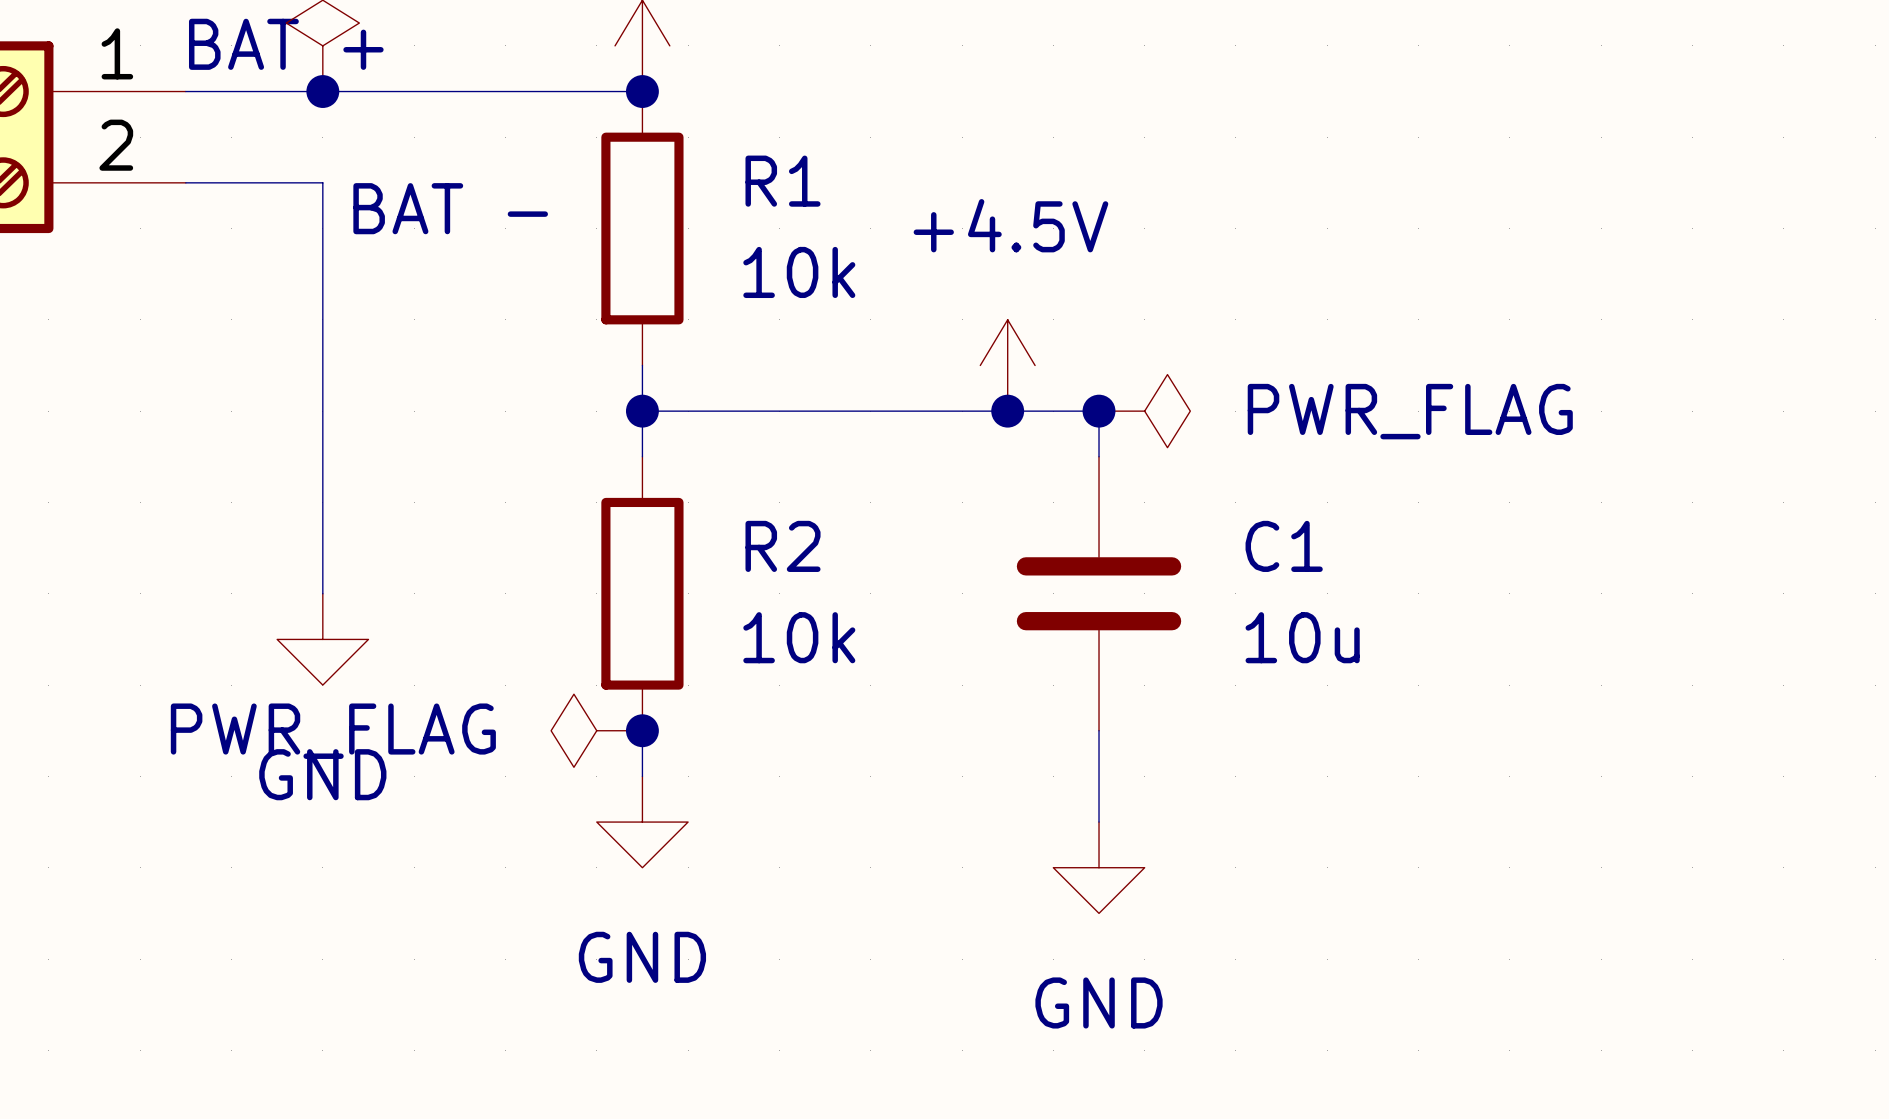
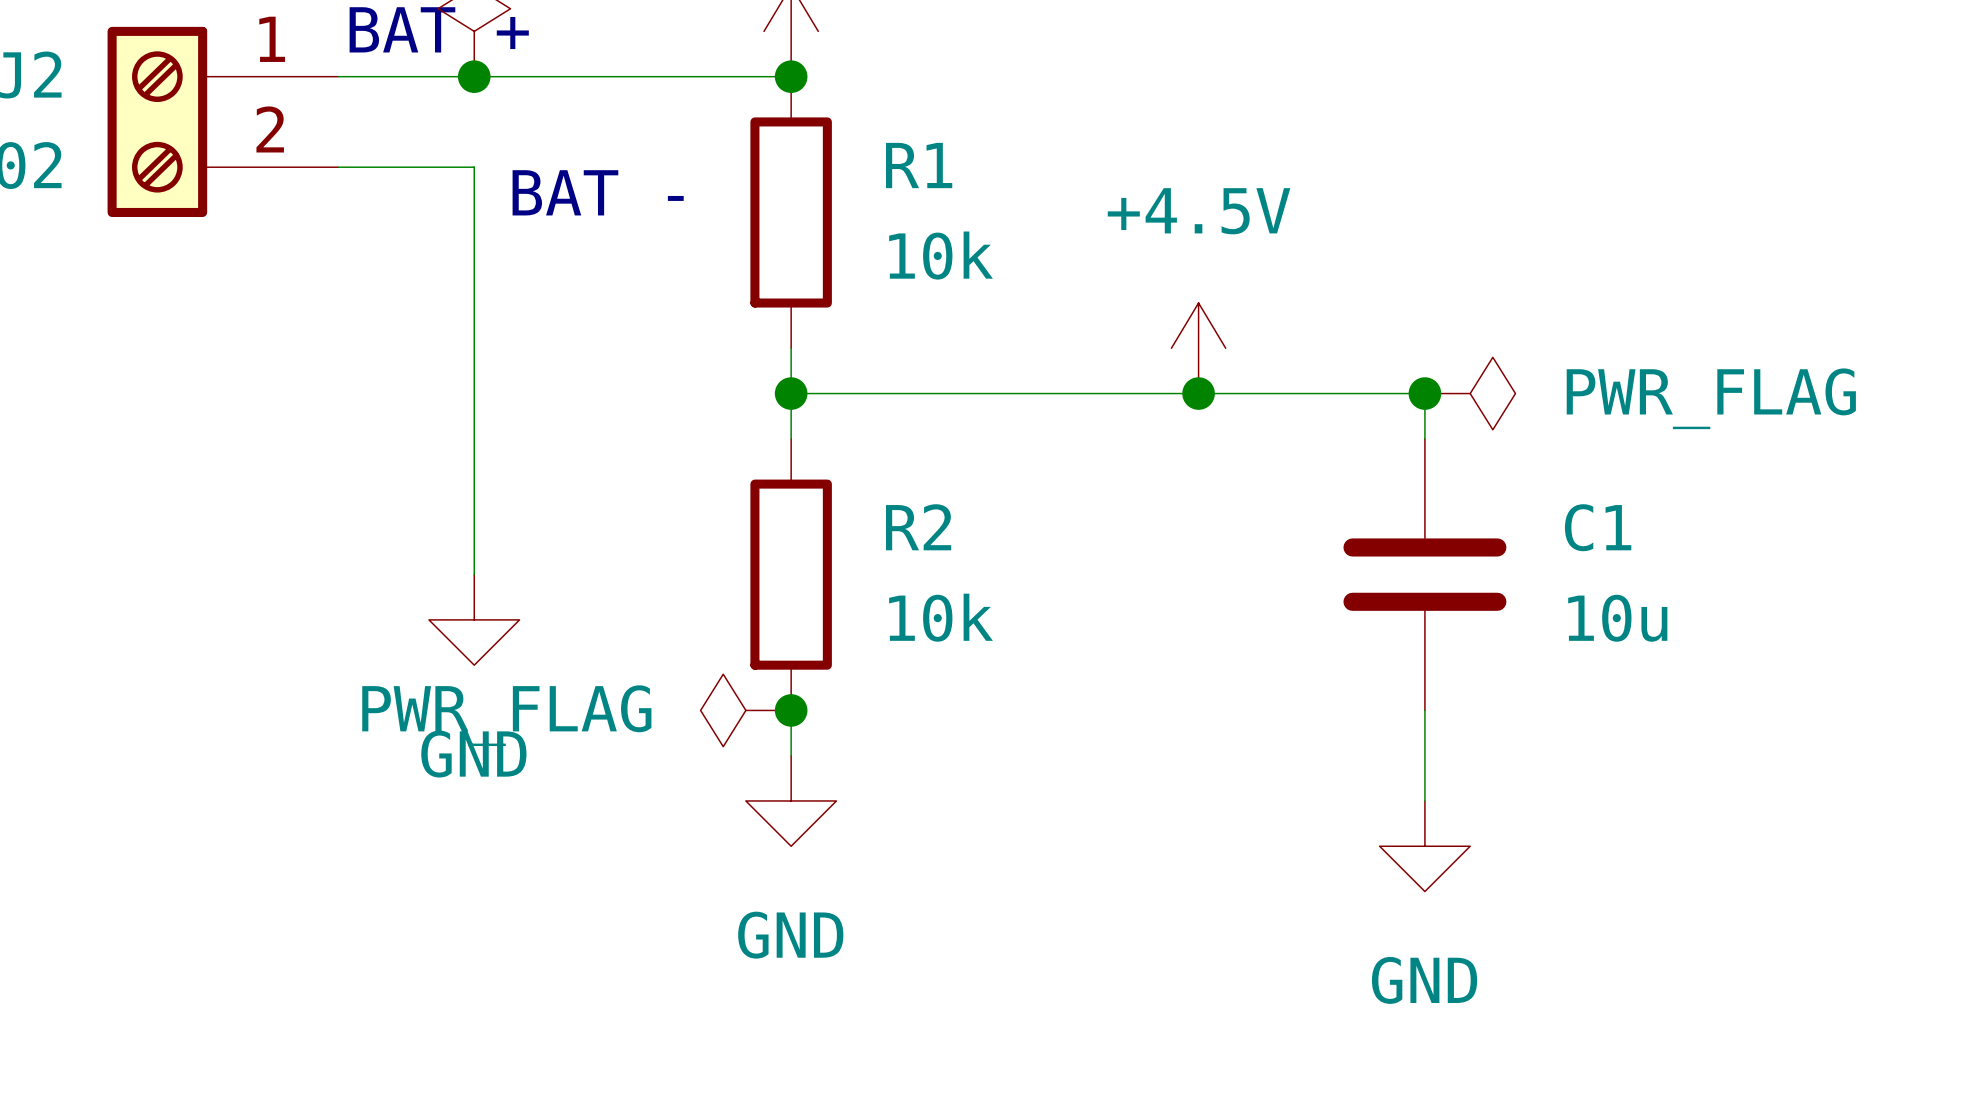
power symbol position: +4.5V (1007, 365) -> +4.5V (1198, 348)
junction: (1007, 411) -> none
junction: none -> (1198, 393)
wire: (1099, 411) (1099, 456) -> (1243, 393) (1424, 393) (1424, 438)
junction: (1099, 411) -> none
power symbol position: PWR_FLAG (1144, 411) -> PWR_FLAG (1470, 393)
junction: none -> (1424, 393)
C1 position: (1099, 593) -> (1424, 574)
wire: (1099, 730) (1099, 822) -> (1424, 710) (1424, 800)
power symbol position: GND (1099, 867) -> GND (1424, 846)

